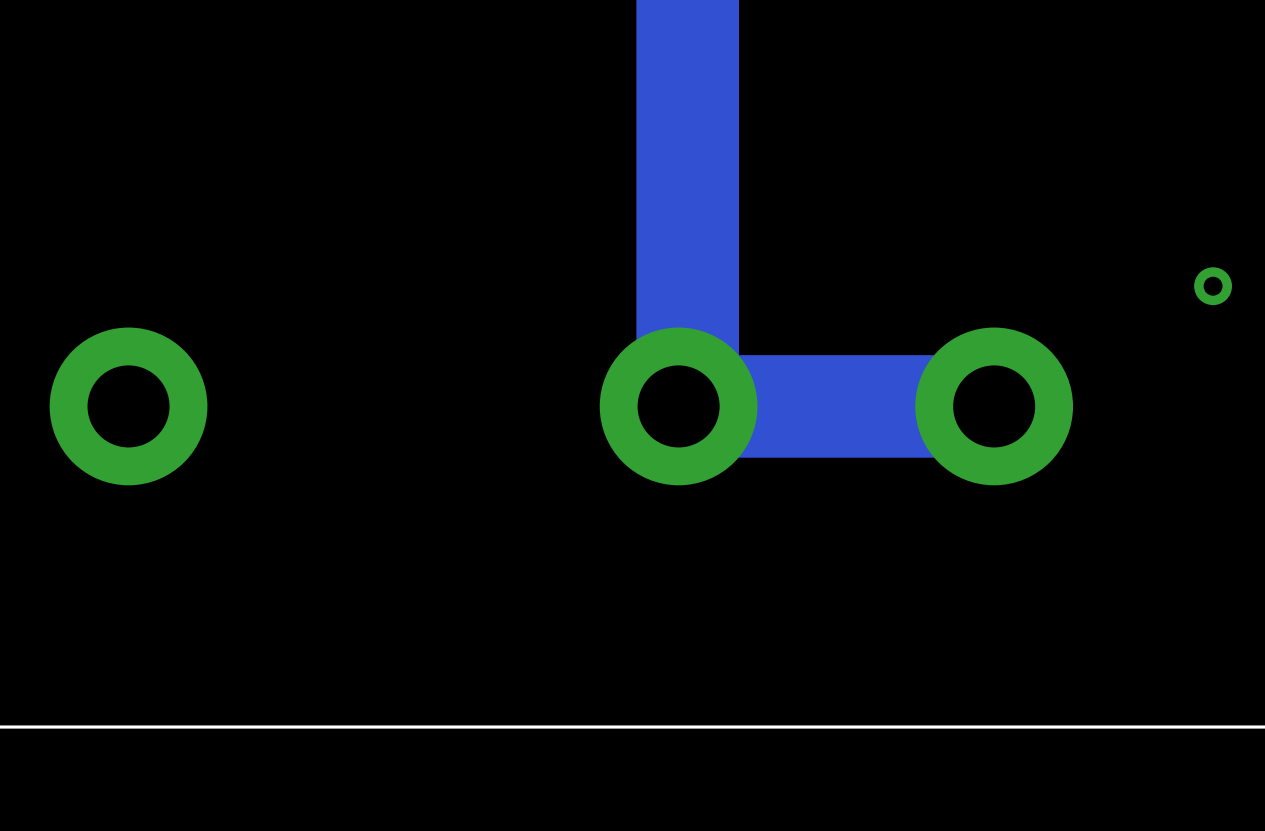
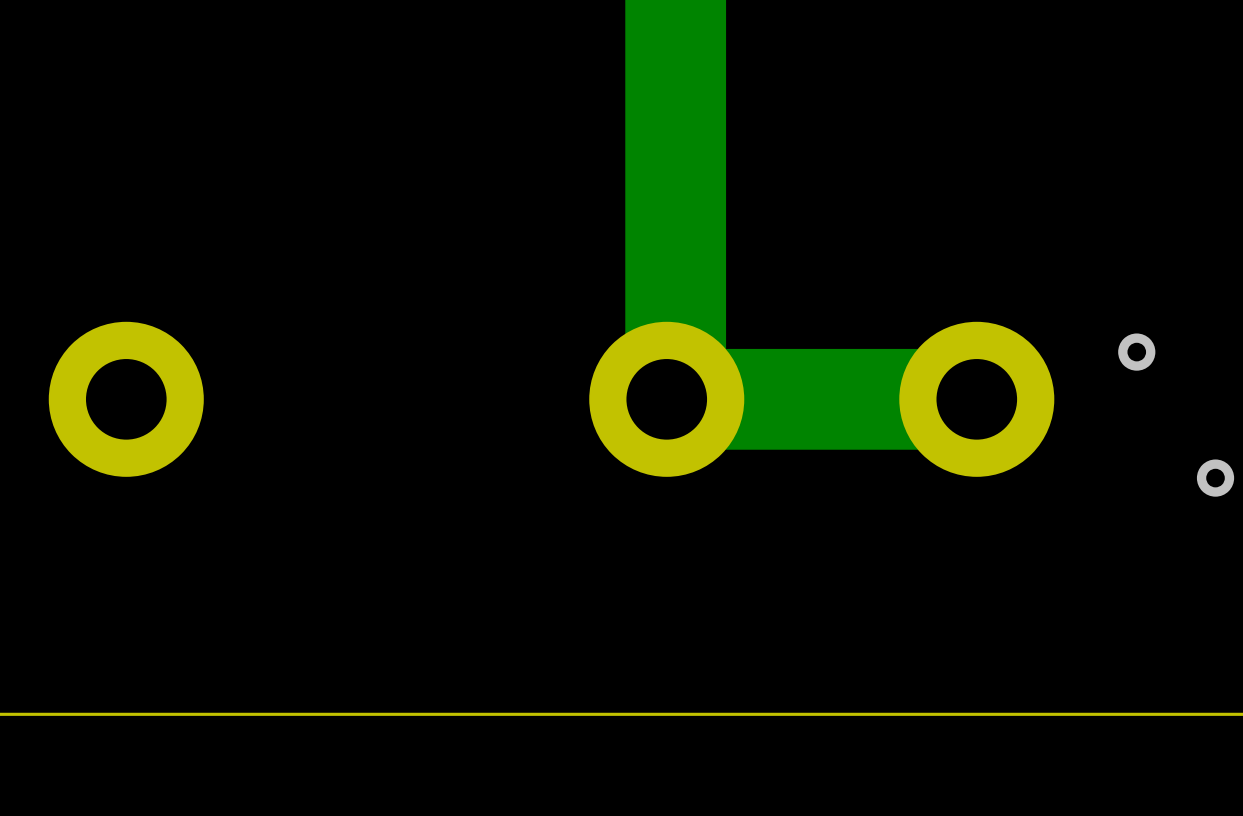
via: (1213, 286) -> none
via: none -> (1136, 352)
via: none -> (1215, 478)

